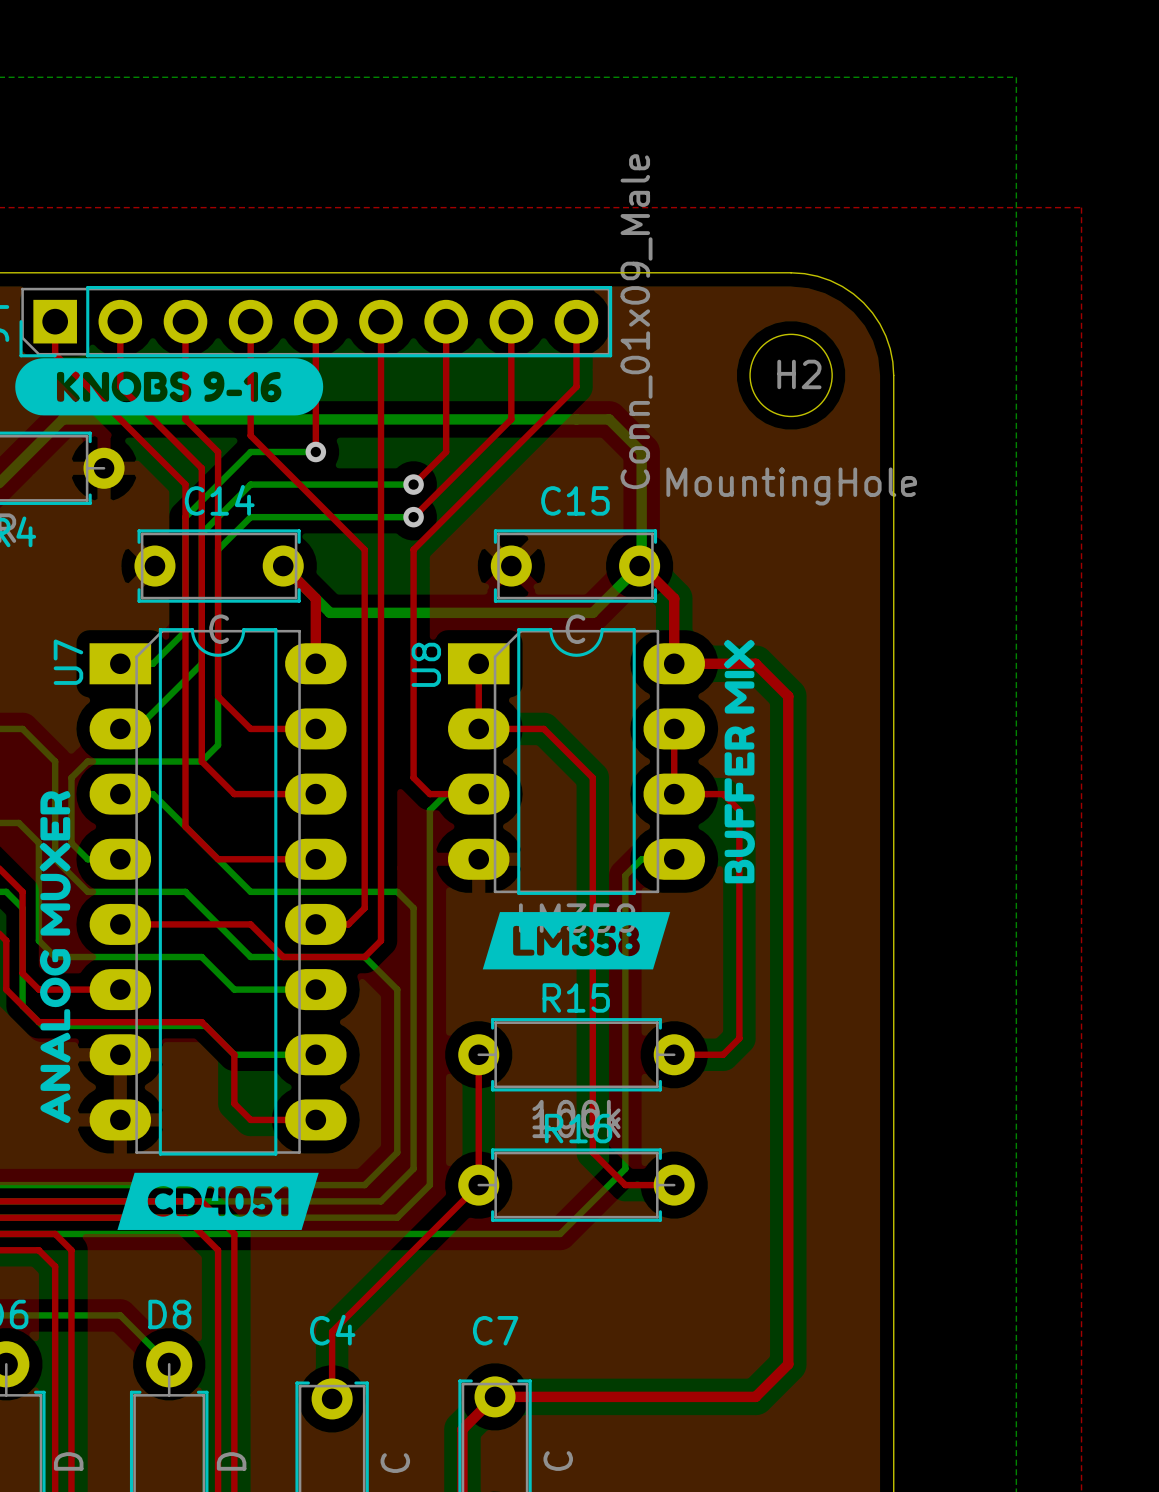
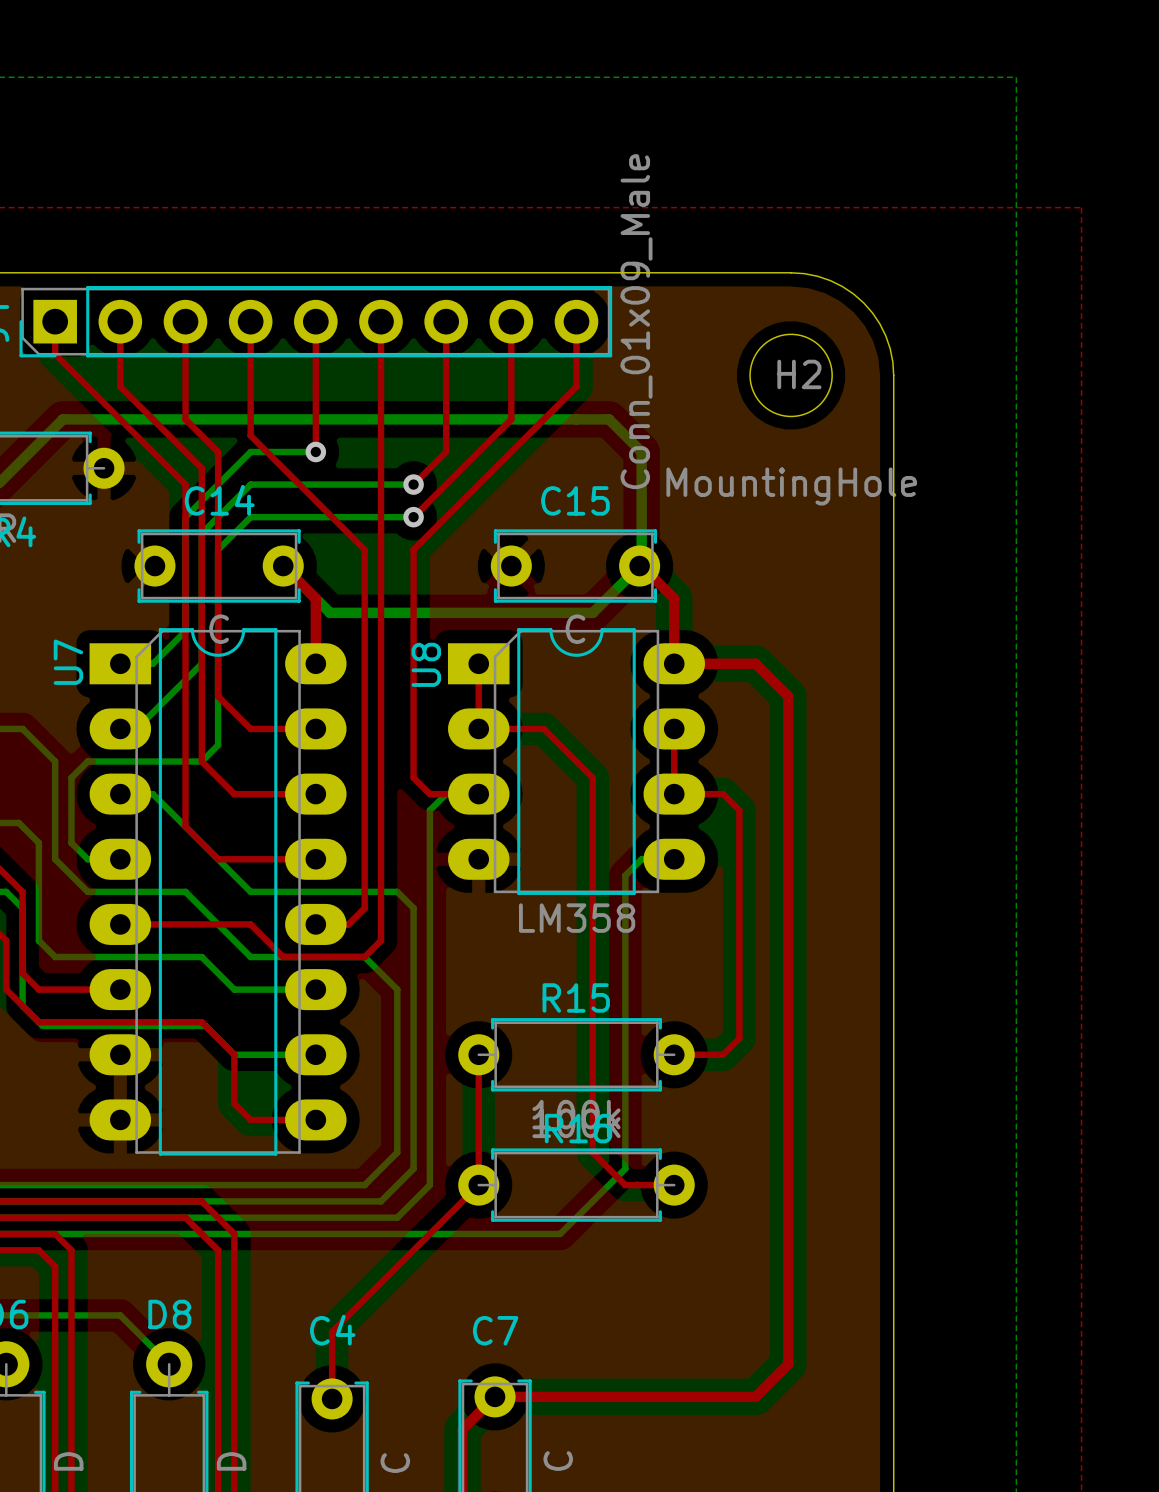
drawing: [15, 358, 324, 416] -> none
drawing: [723, 639, 755, 884] -> none
drawing: [39, 790, 71, 1124] -> none
drawing: [482, 912, 671, 970] -> none
drawing: [117, 1172, 319, 1230] -> none

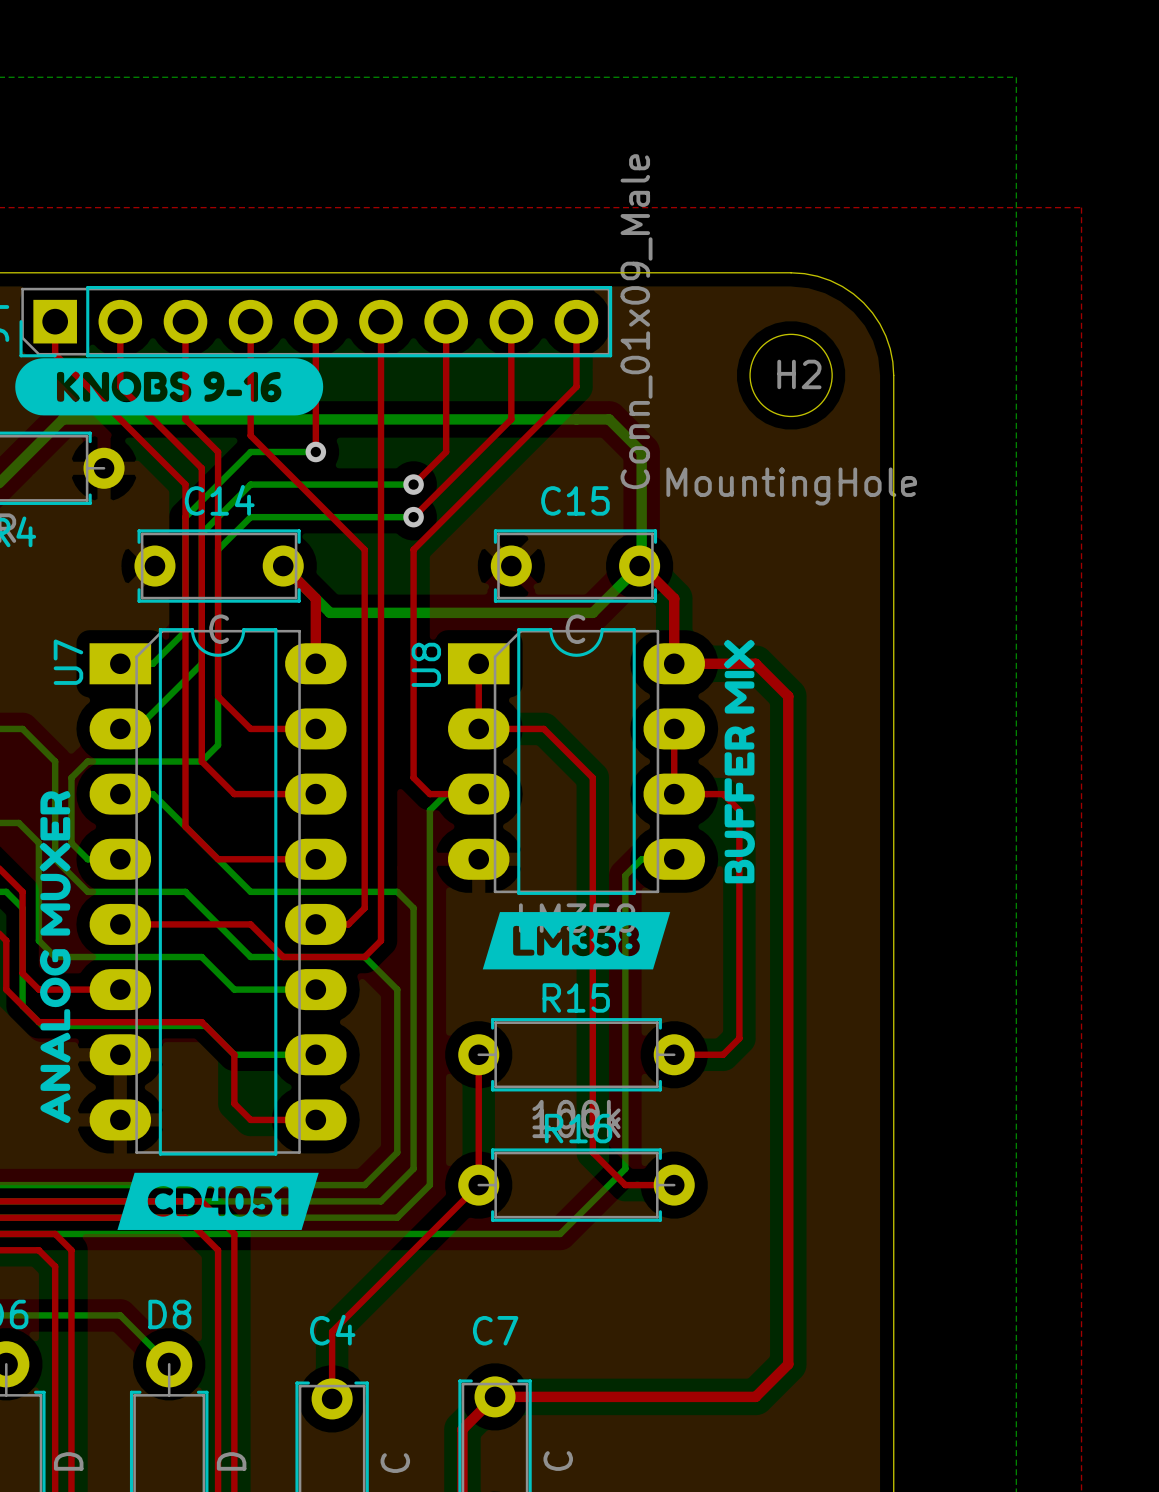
drawing: none -> [15, 358, 324, 416]
drawing: none -> [723, 639, 755, 884]
drawing: none -> [39, 790, 71, 1124]
drawing: none -> [482, 912, 671, 970]
drawing: none -> [117, 1172, 319, 1230]

